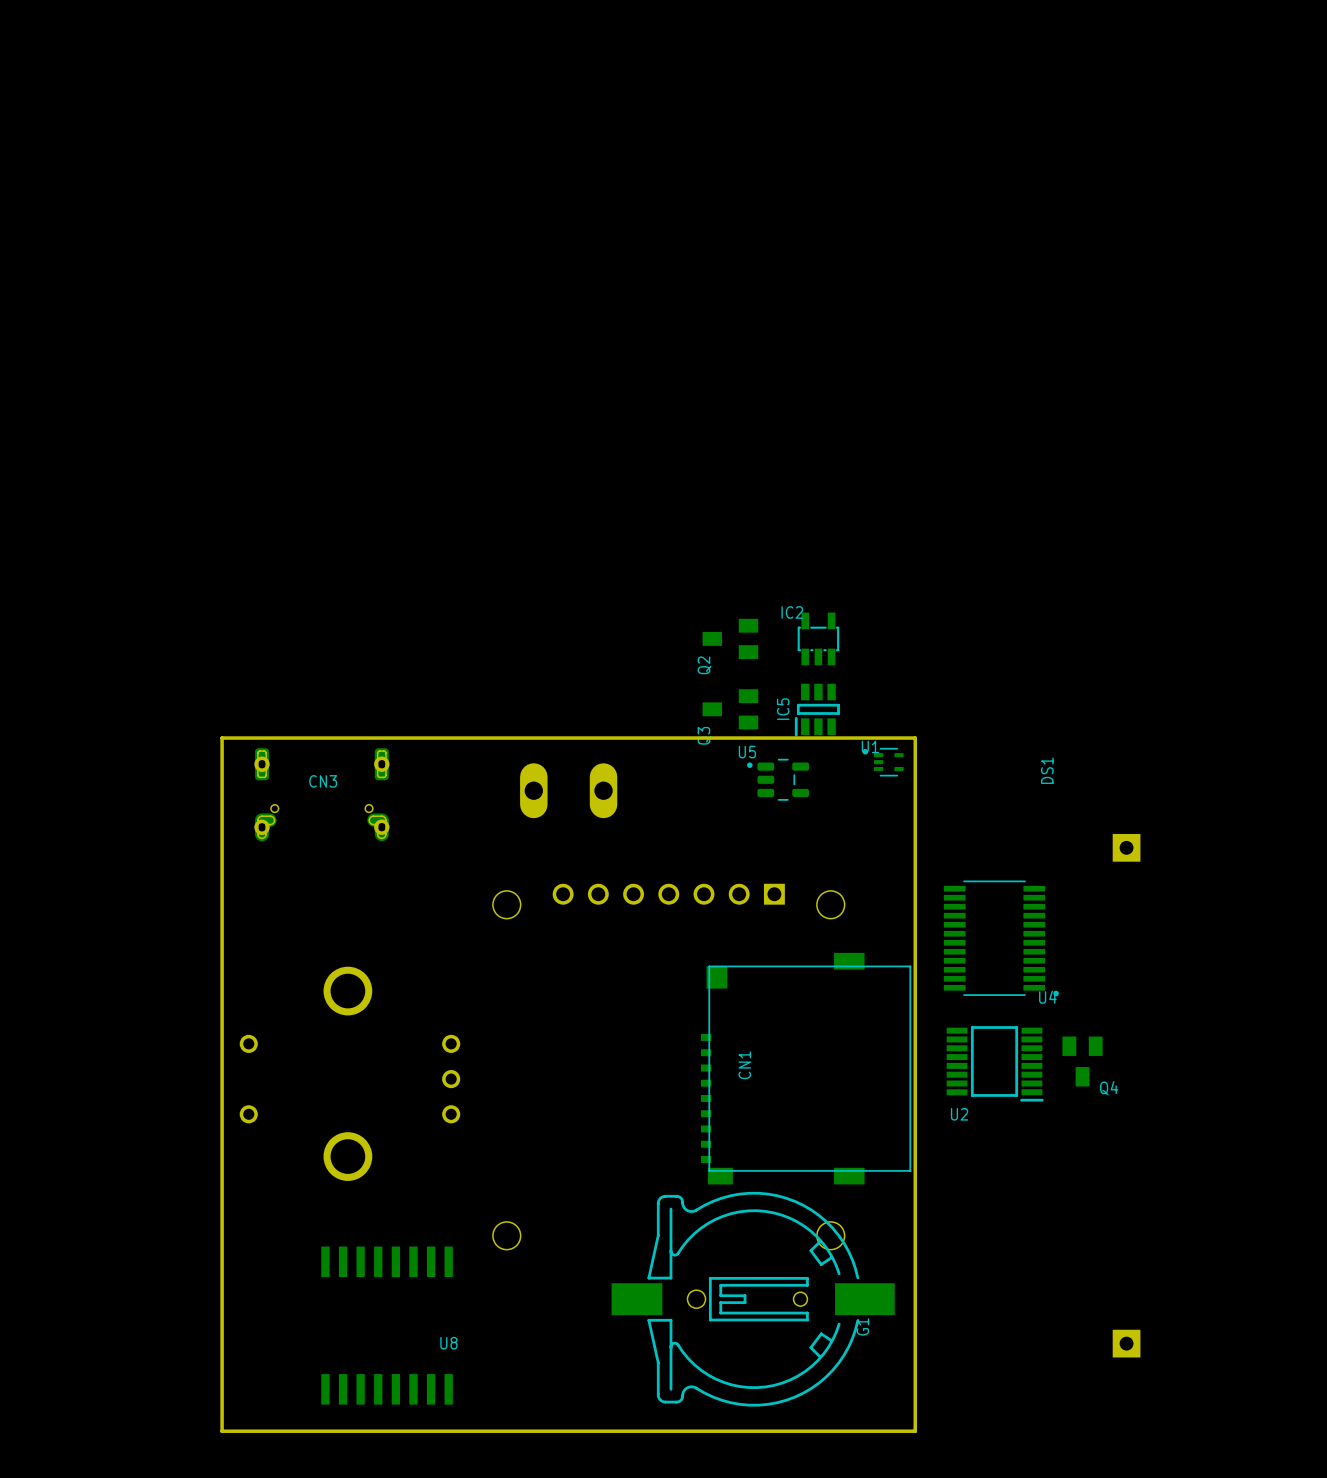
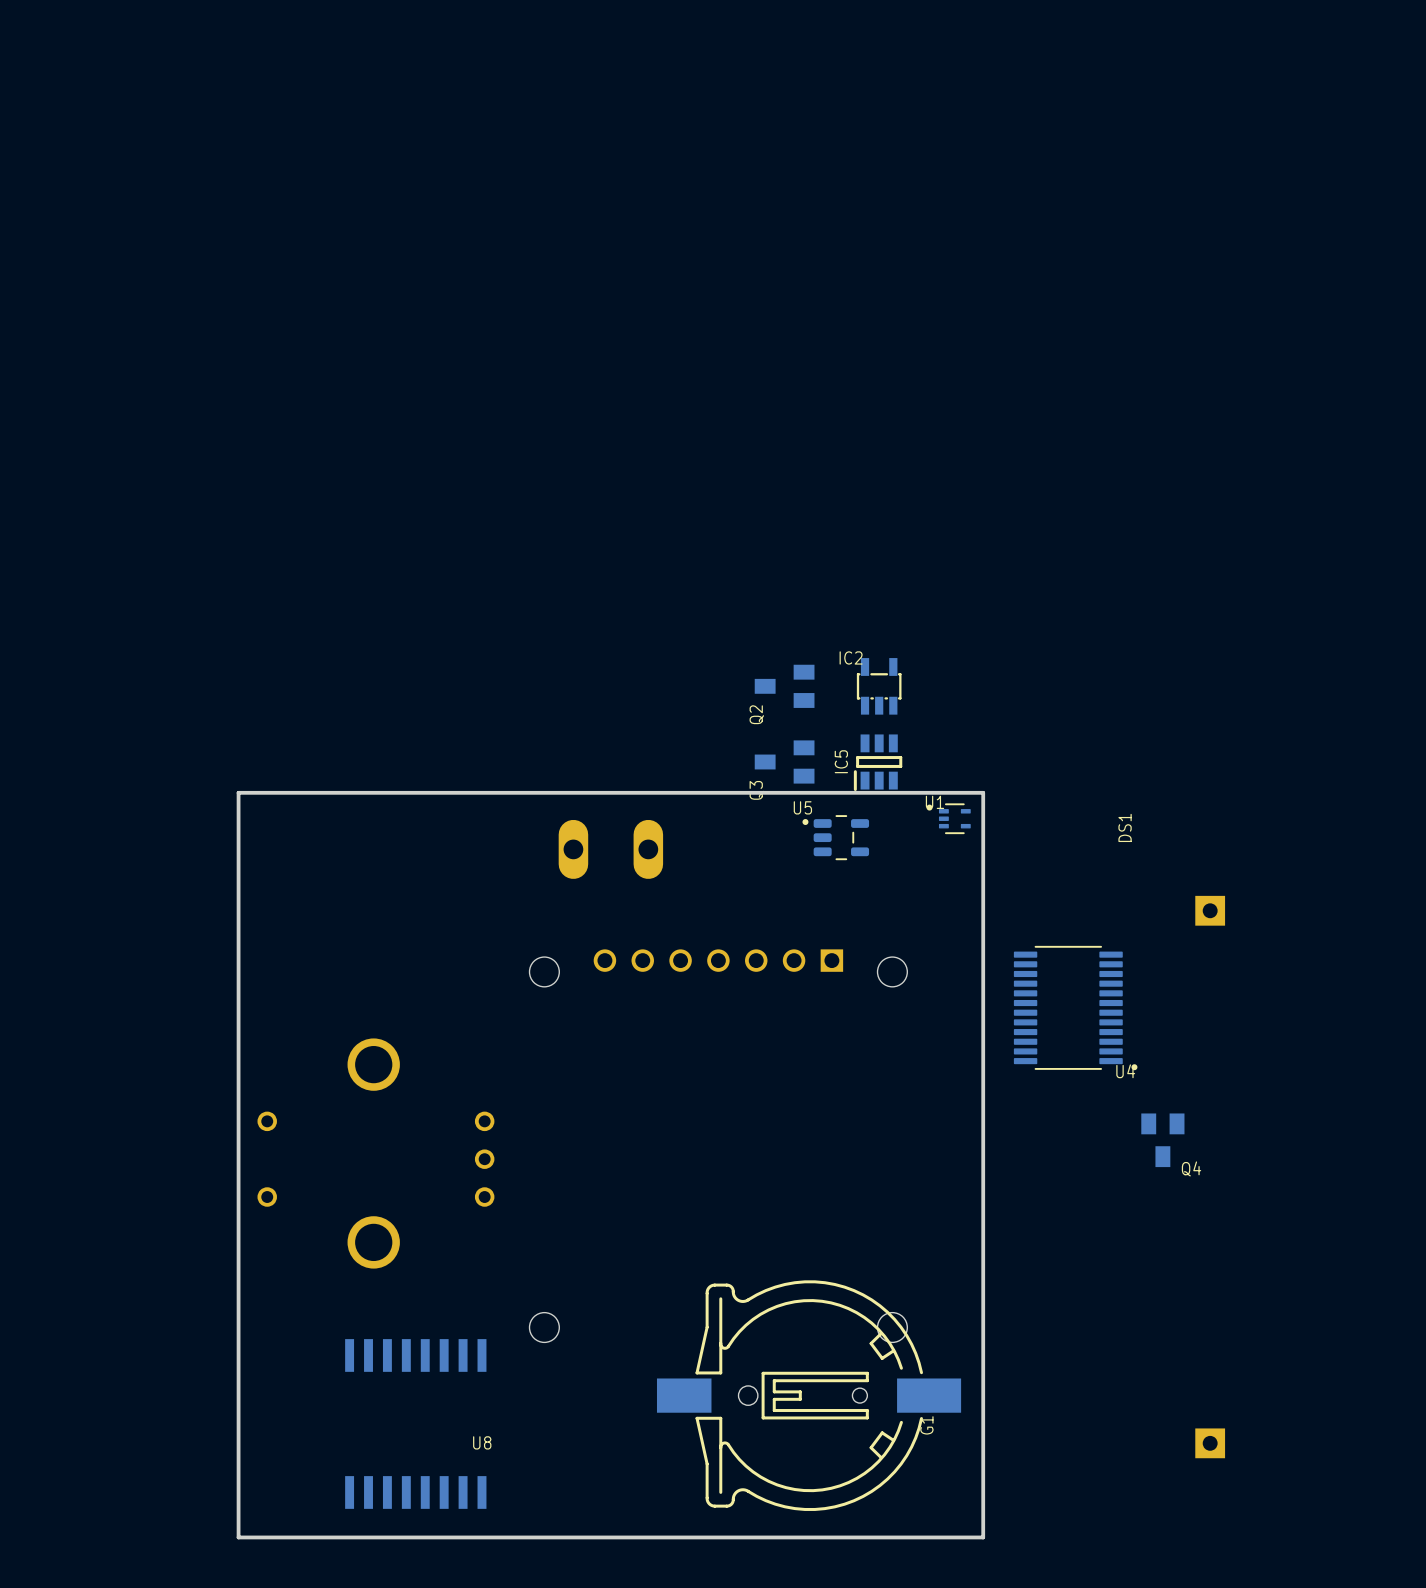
CN3: (321, 794) -> none
U2: (995, 1063) -> none
CN1: (806, 1068) -> none

